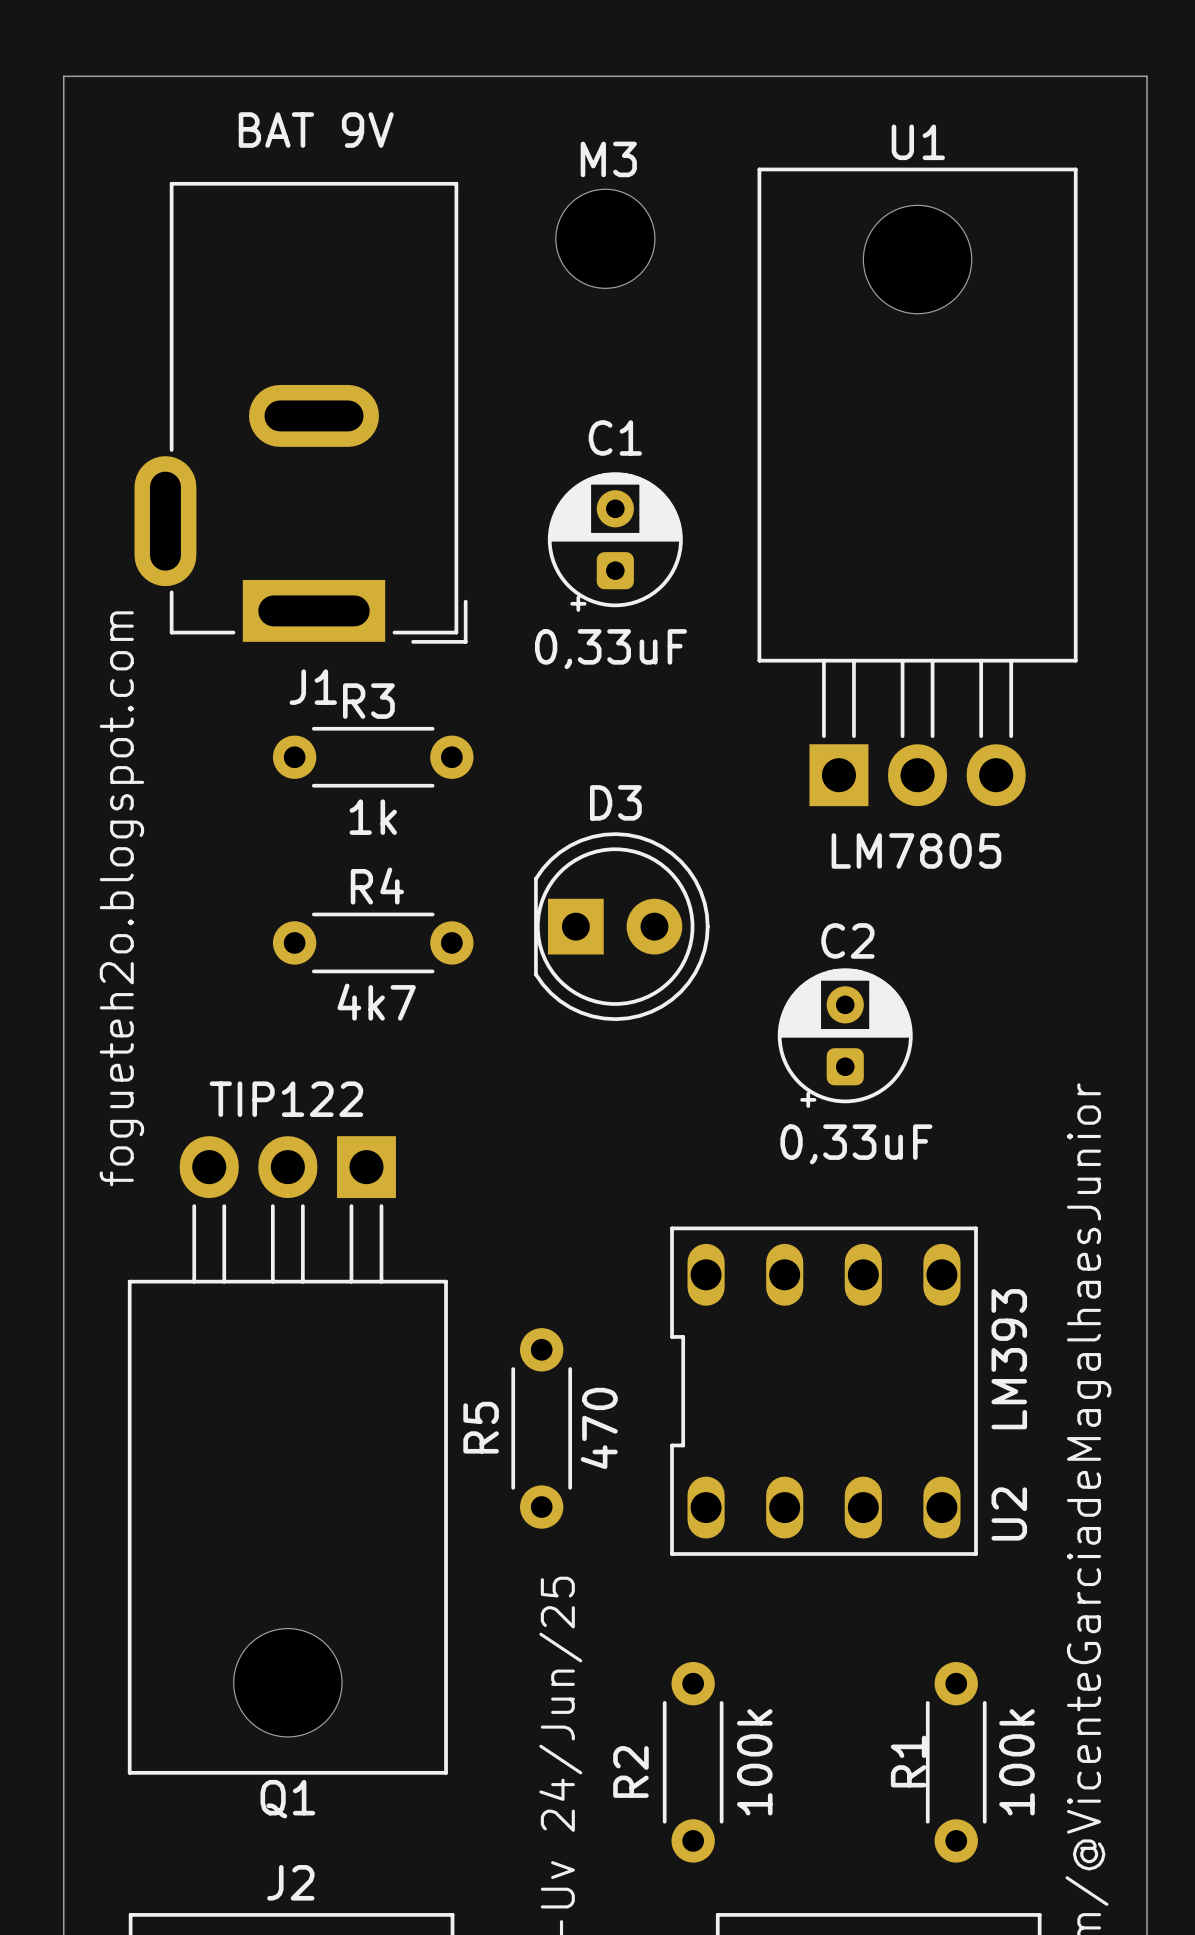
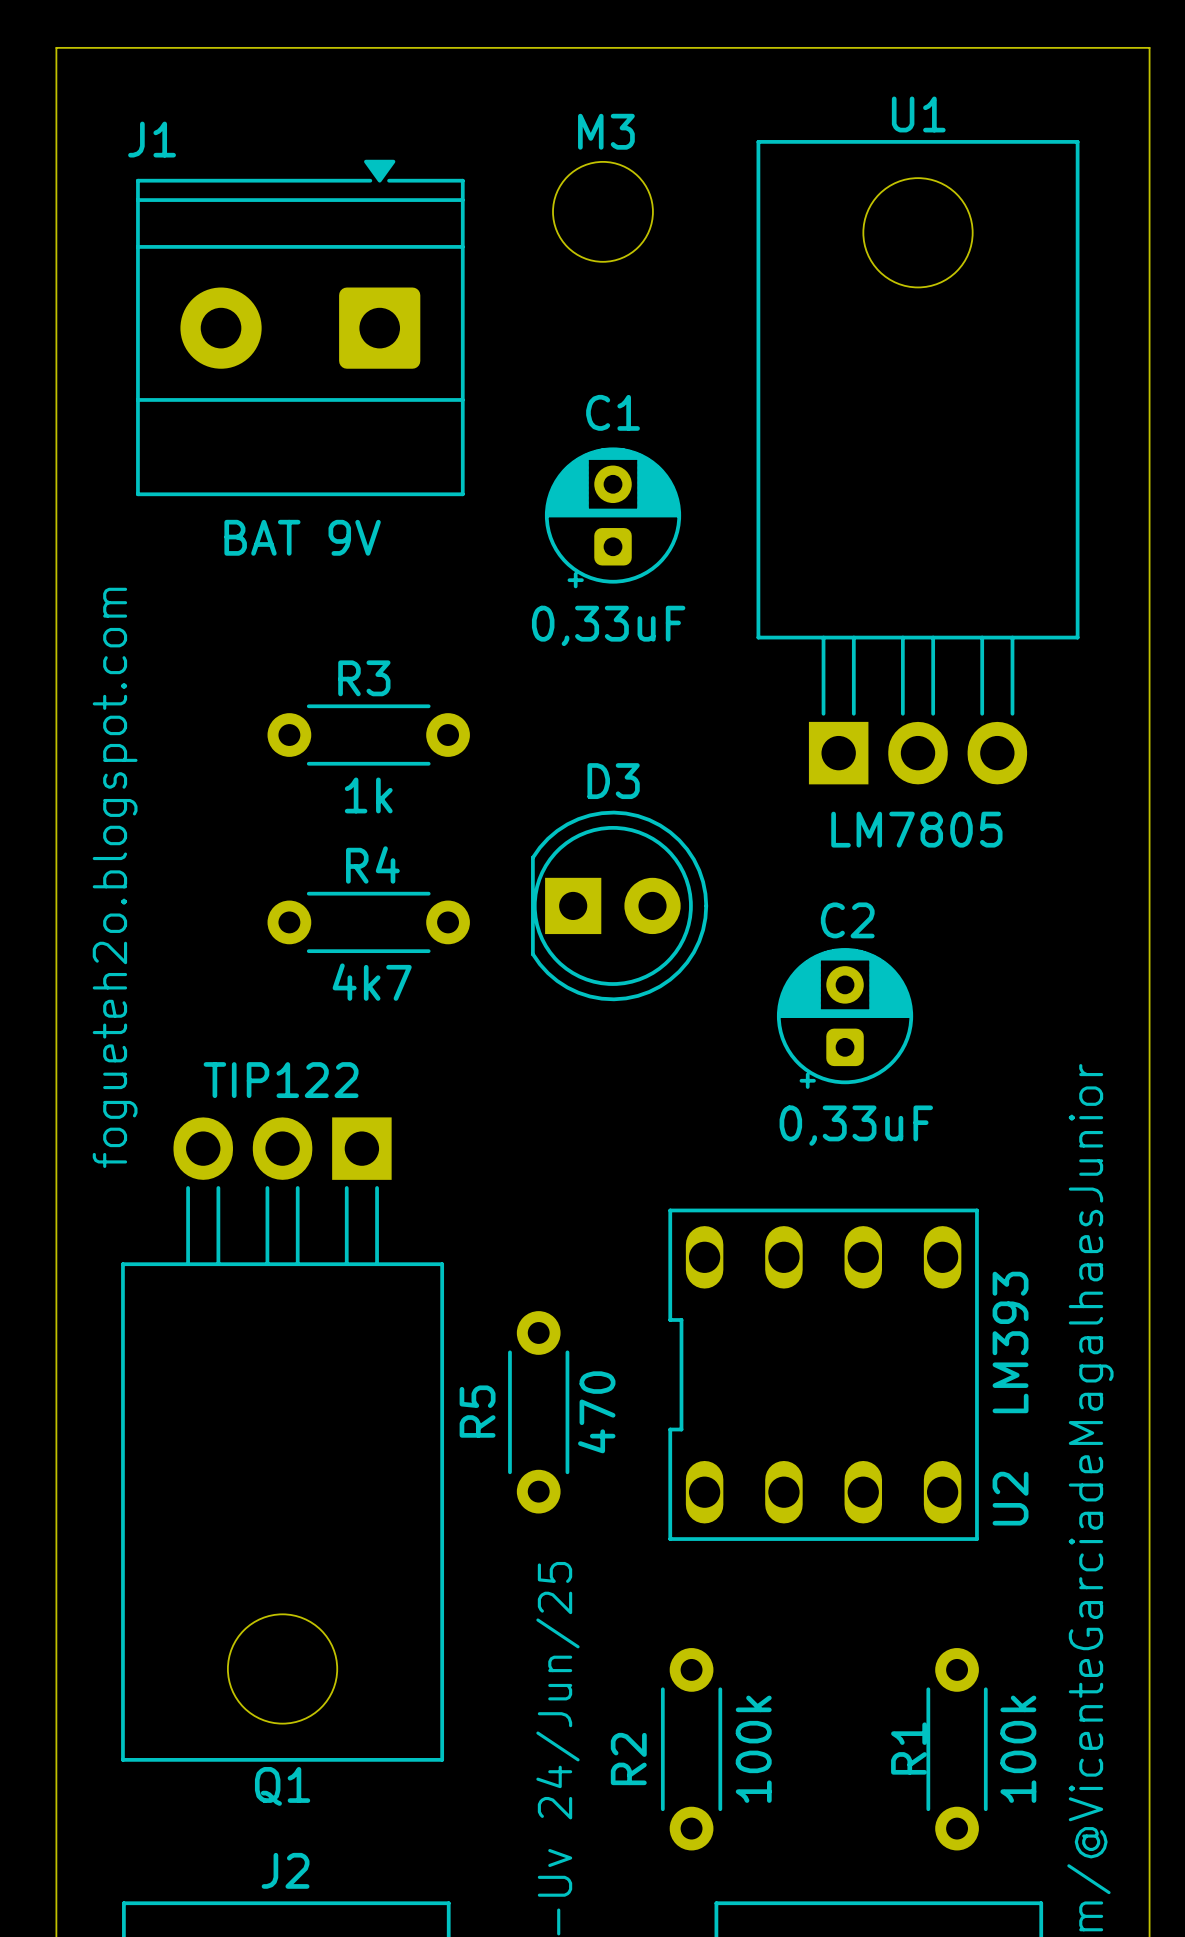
J1 value position: BAT 9V (316, 130) -> BAT 9V (302, 537)
J1 footprint: [134, 181, 468, 644] -> [136, 159, 465, 497]
J1 name position: J1 (313, 687) -> J1 (152, 139)

